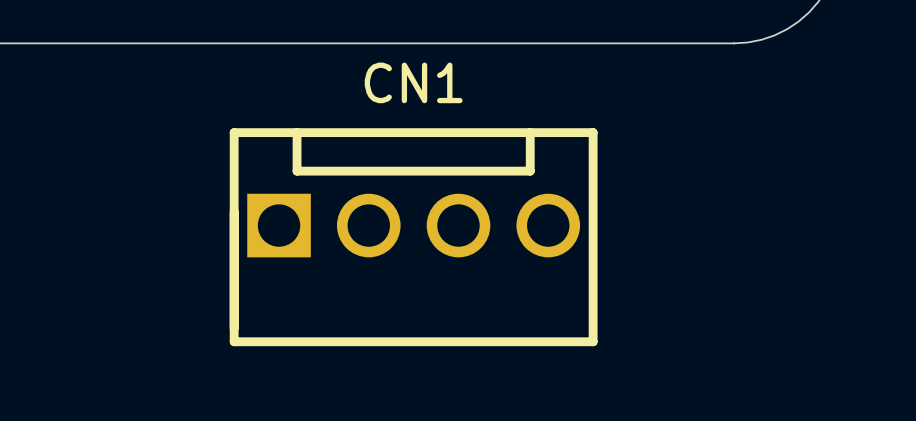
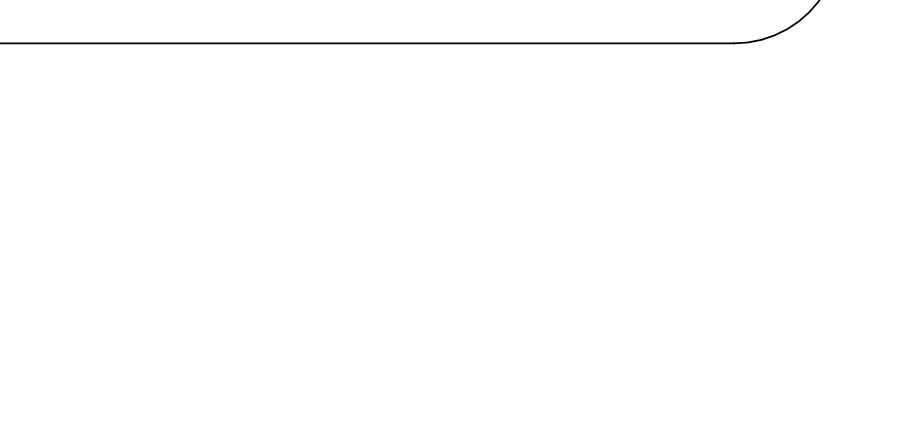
CN1: (413, 237) -> none

